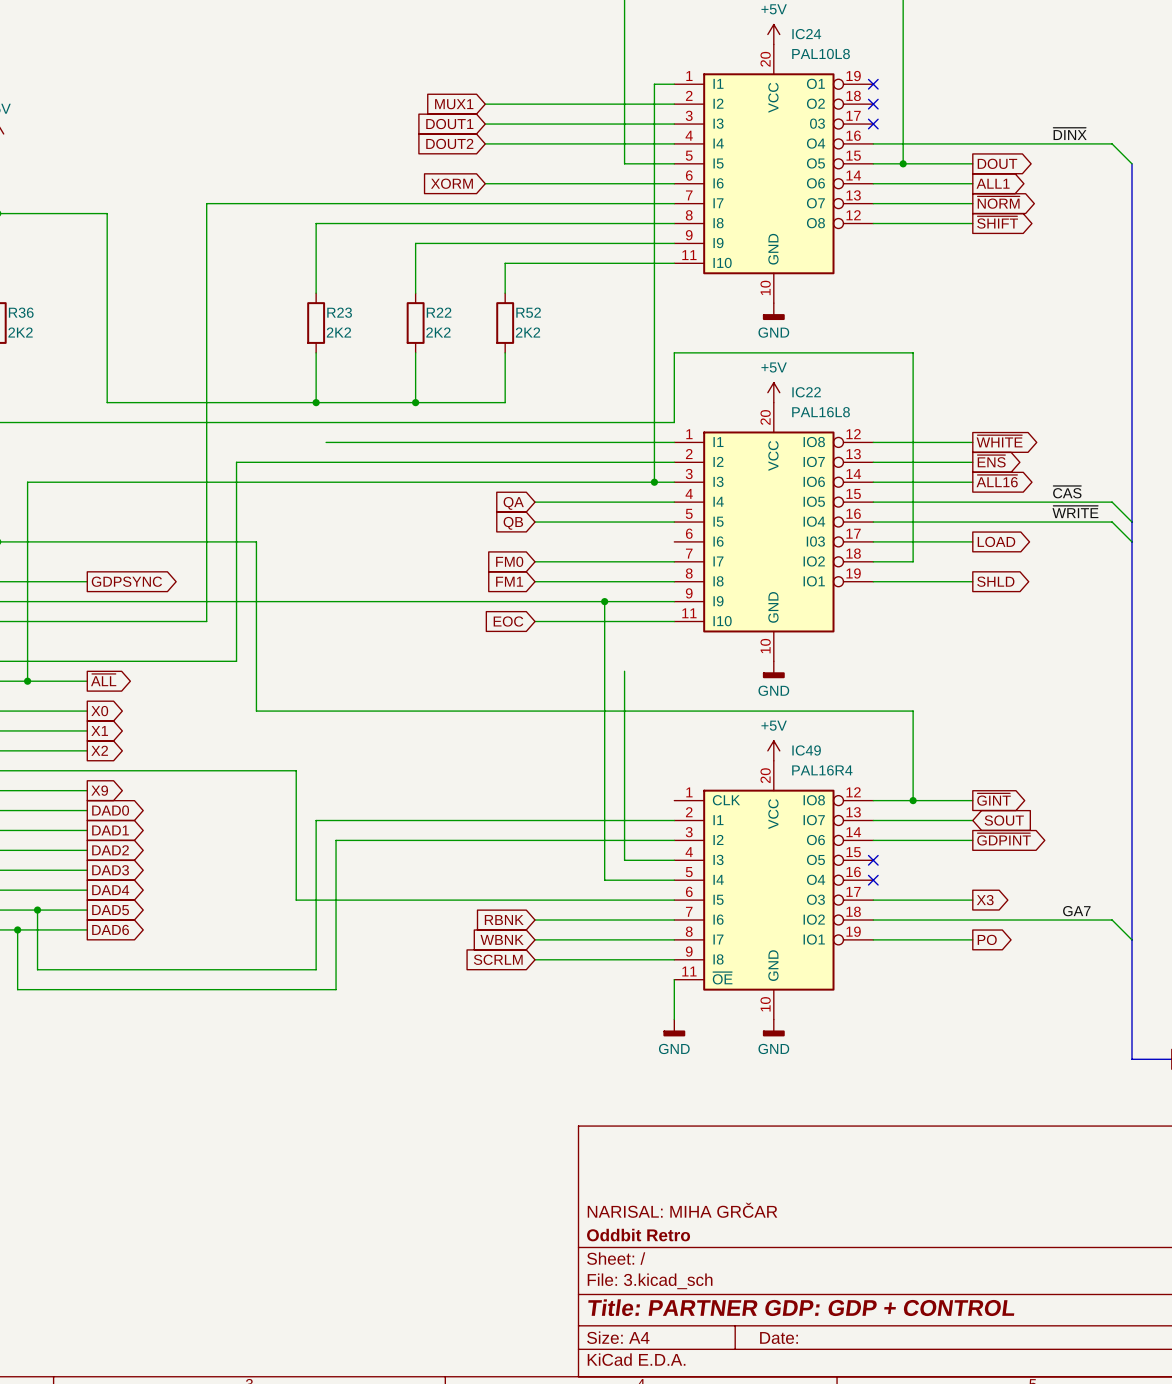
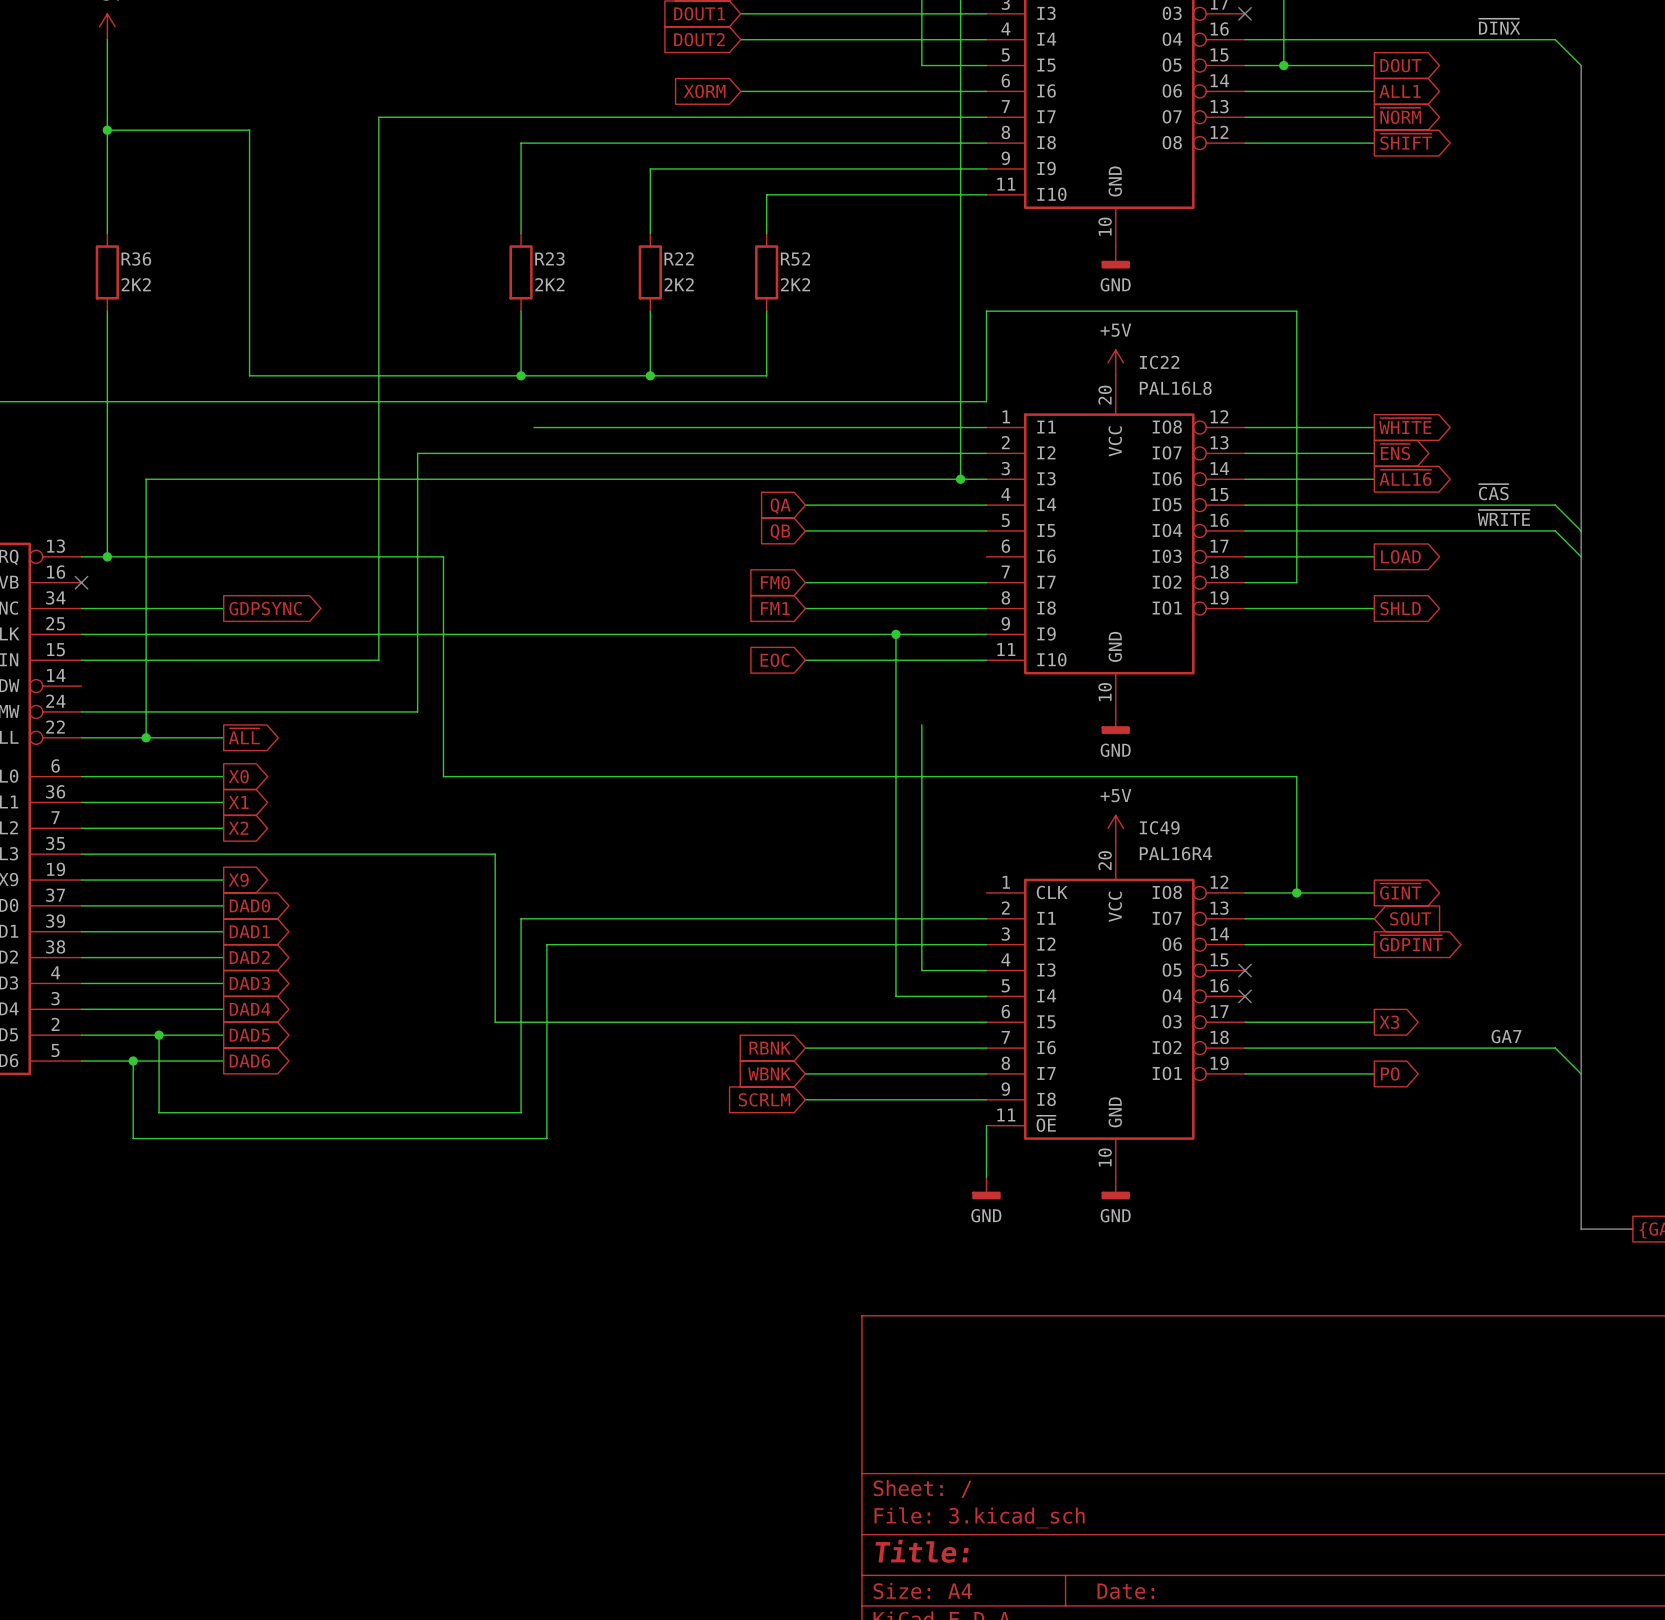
title block: NARISAL: MIHA GRČAR (682, 1210) -> none
title block: Oddbit Retro (638, 1235) -> none
title block: Title: PARTNER GDP: GDP + CONTROL (801, 1307) -> Title: (922, 1551)

